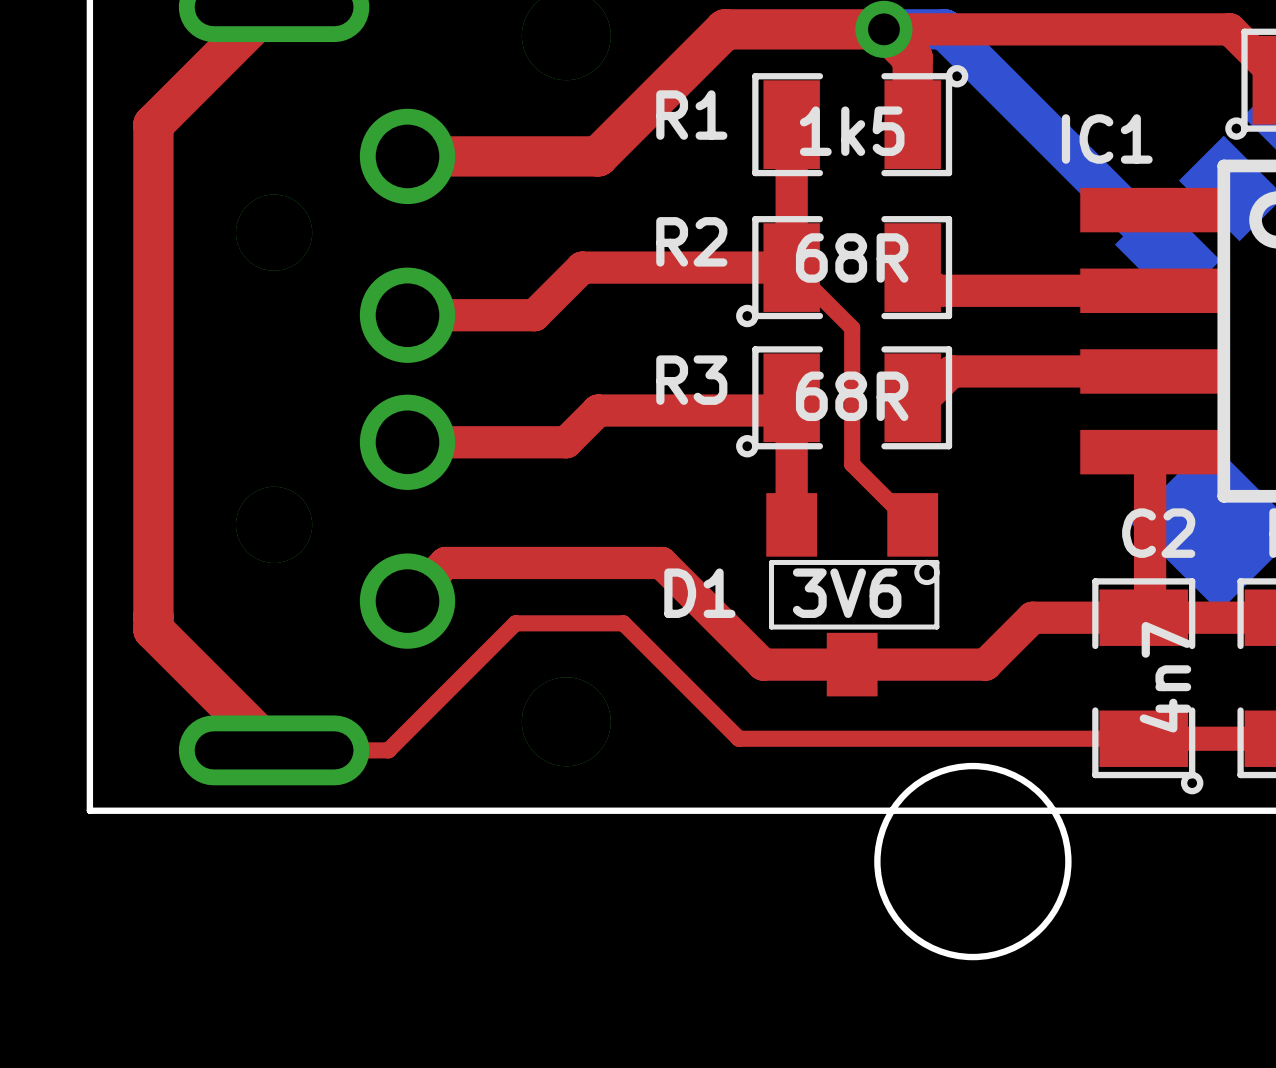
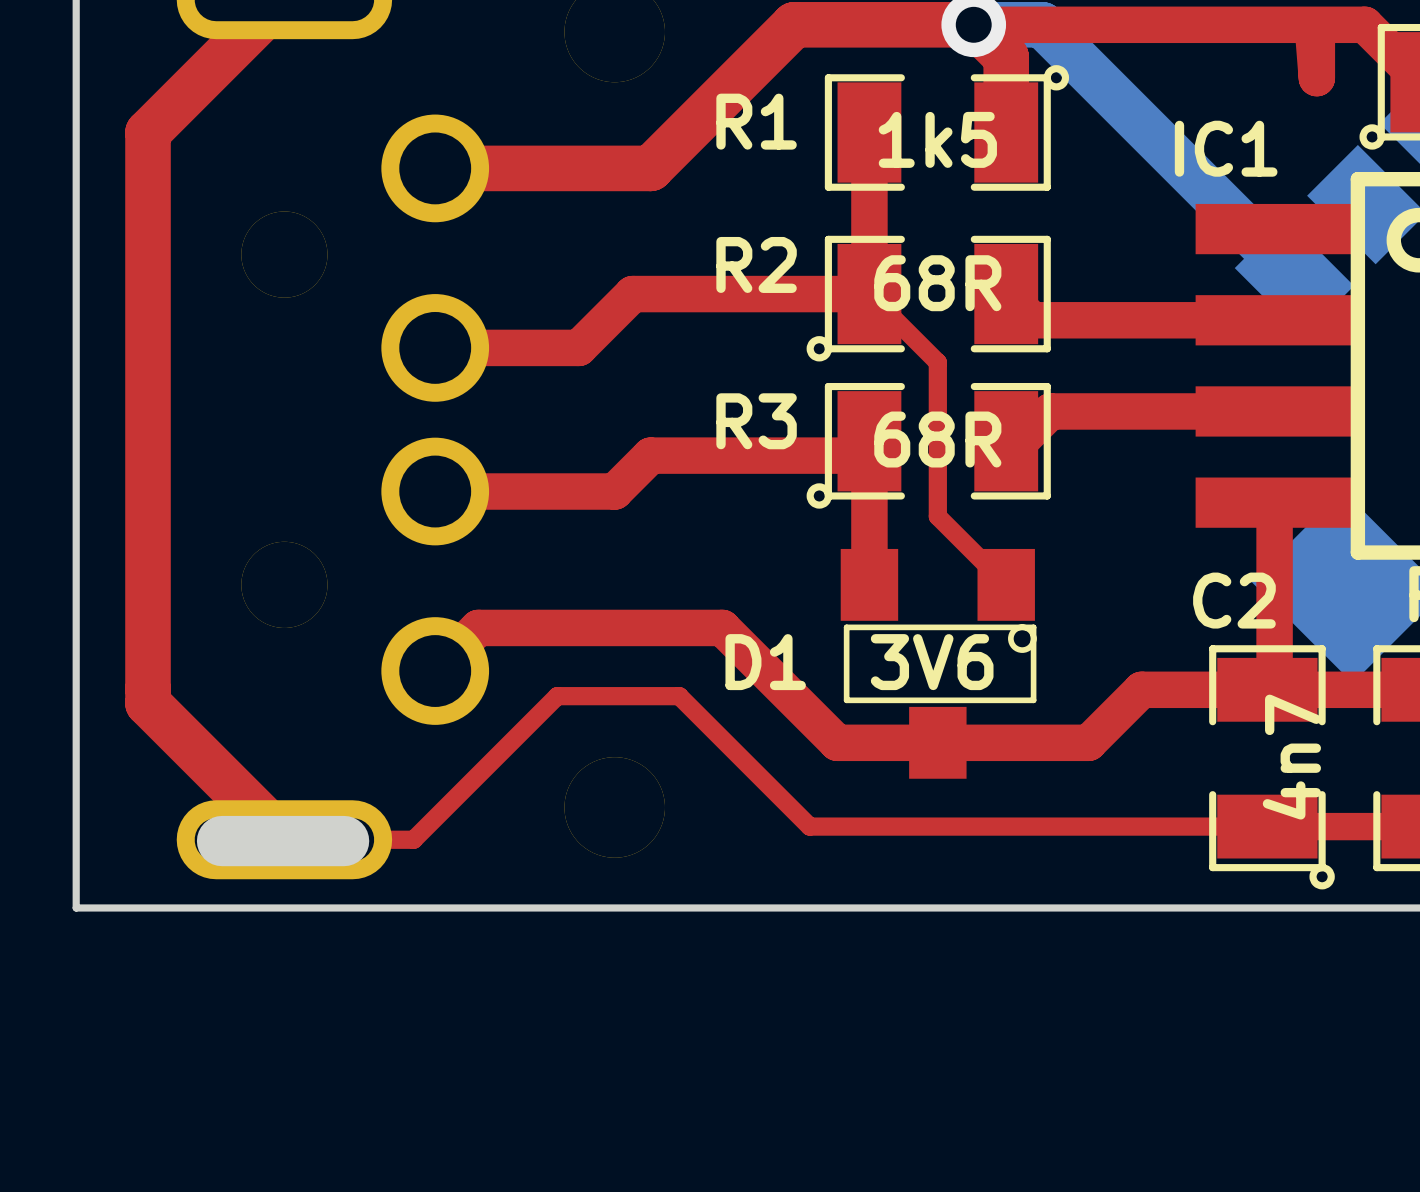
top track: none -> (1313, 35) (1316, 38) (1316, 78) (1313, 35)
C2 name position: C2 (1158, 533) -> C2 (1234, 600)
board edge: none -> (222, 841) (344, 841)
round board edge: [874, 762, 1072, 961] -> none

